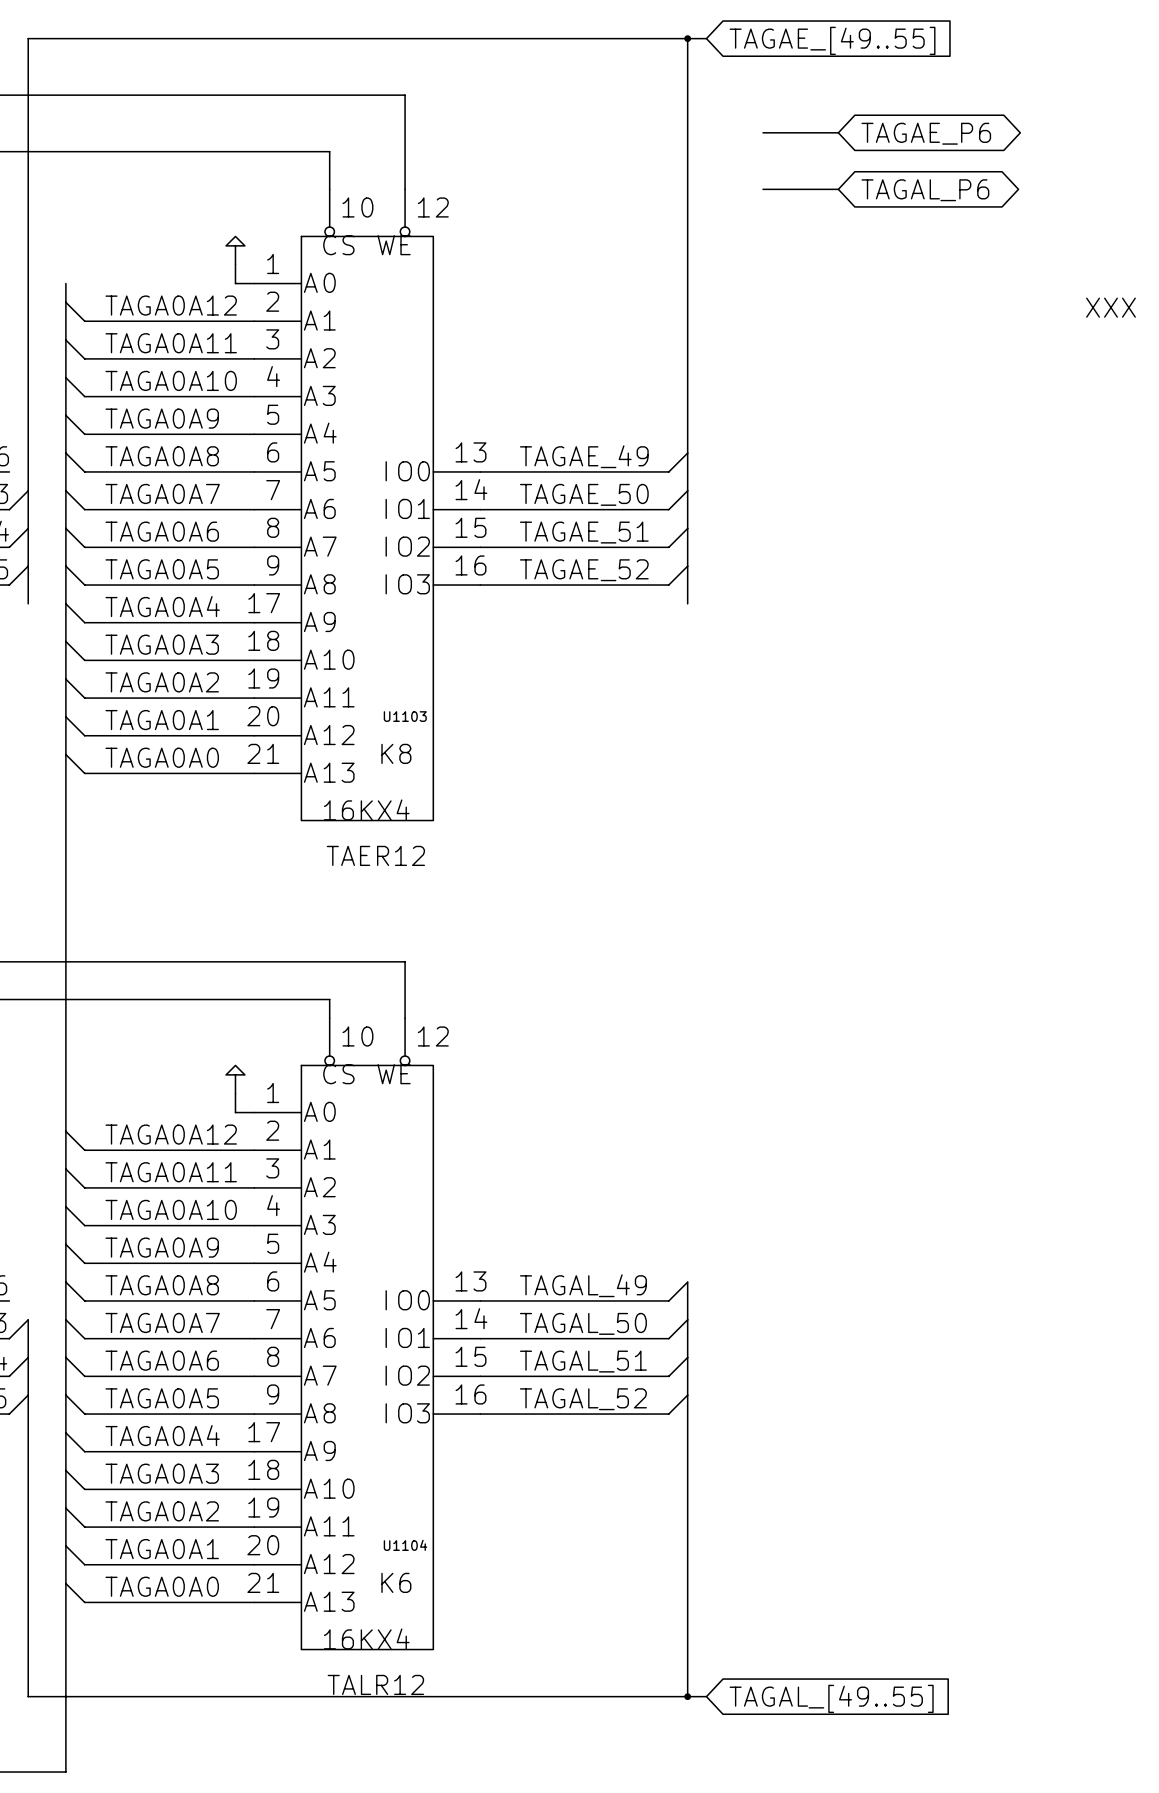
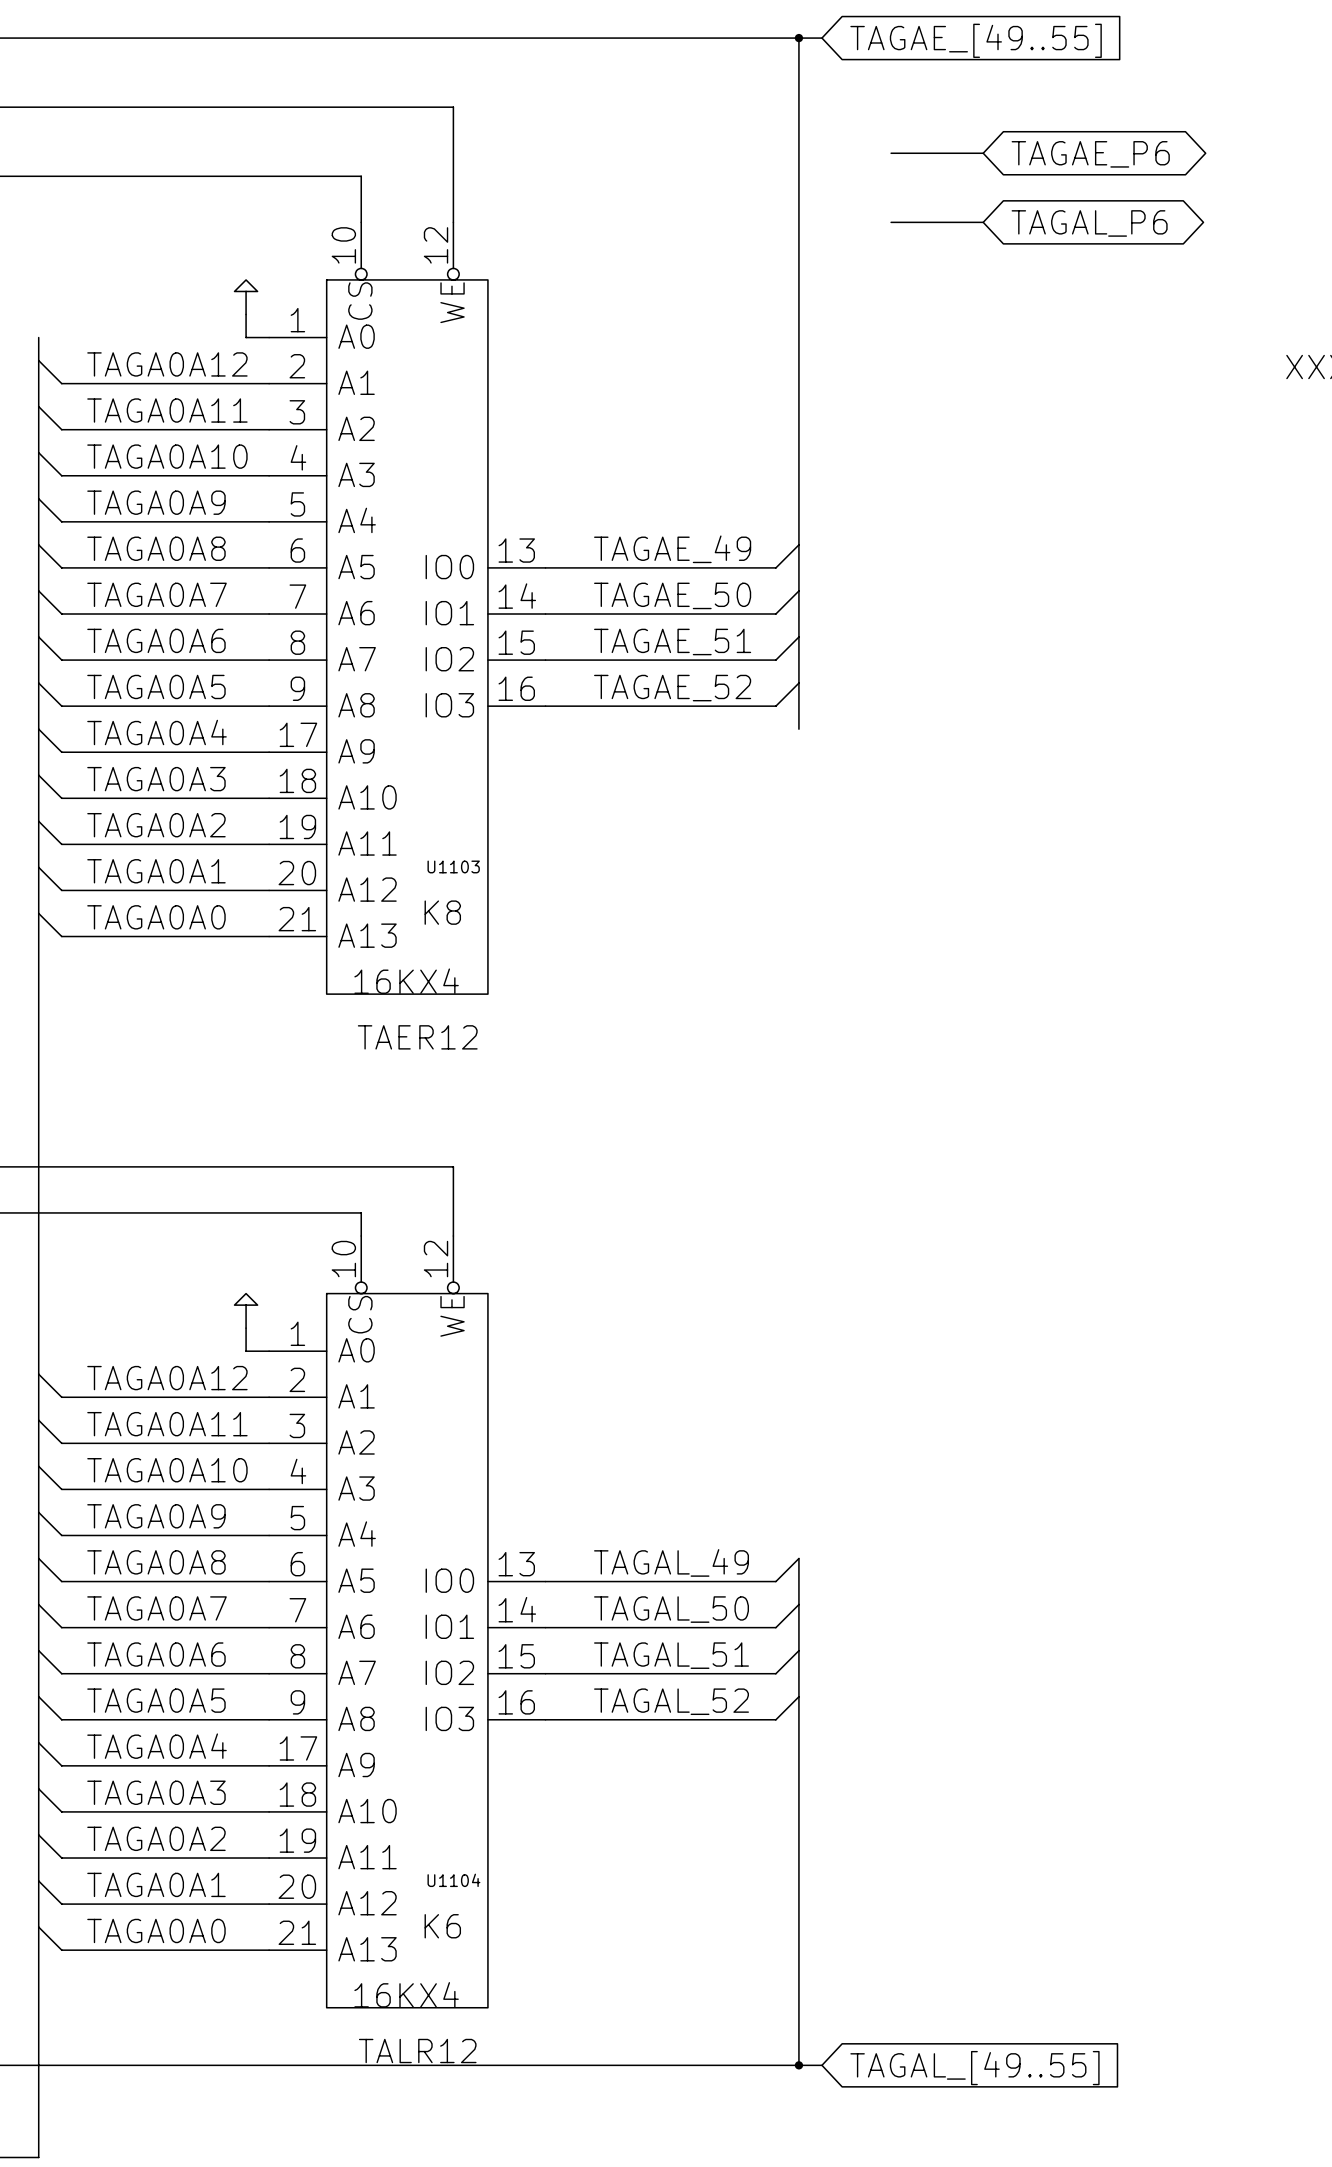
U1103 symbol: [254, 189, 481, 821] -> [269, 222, 546, 995]
U1104 symbol: [254, 1018, 481, 1650] -> [269, 1236, 546, 2008]

